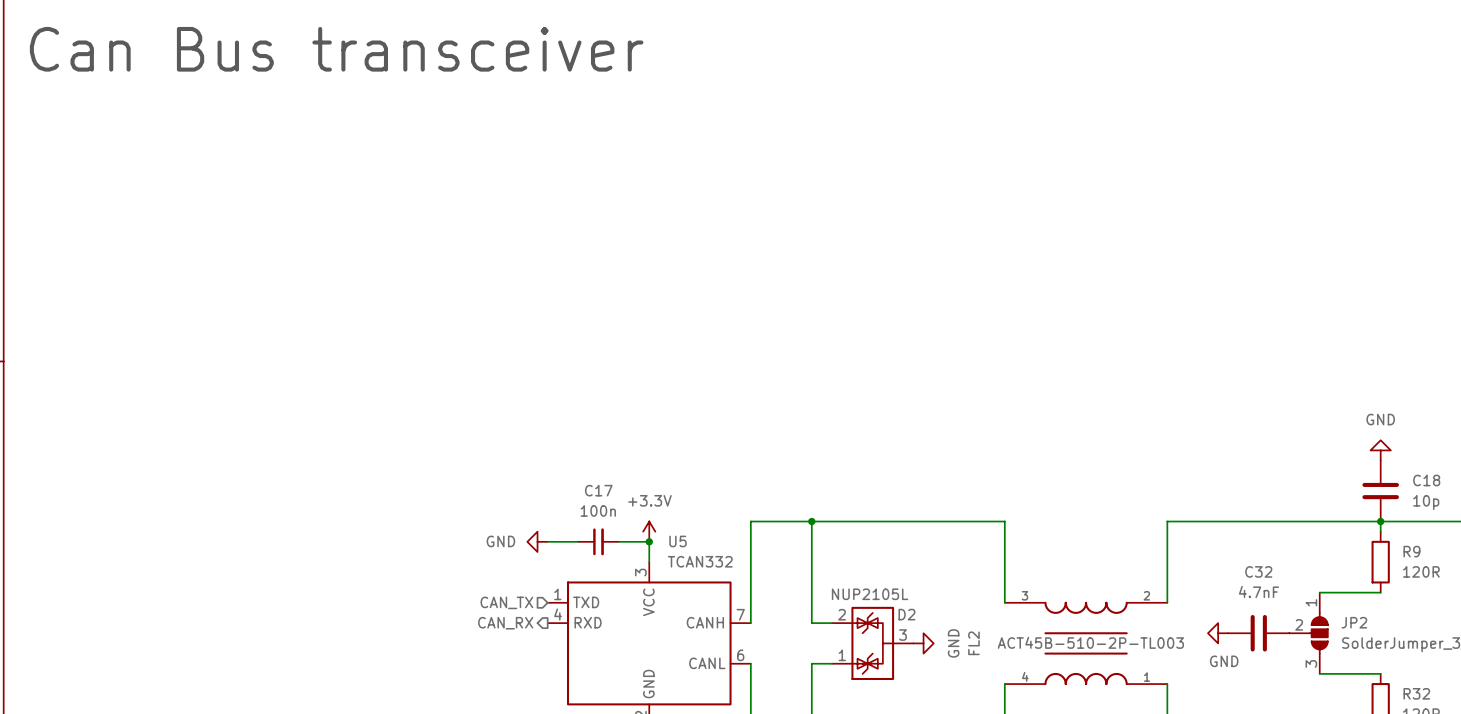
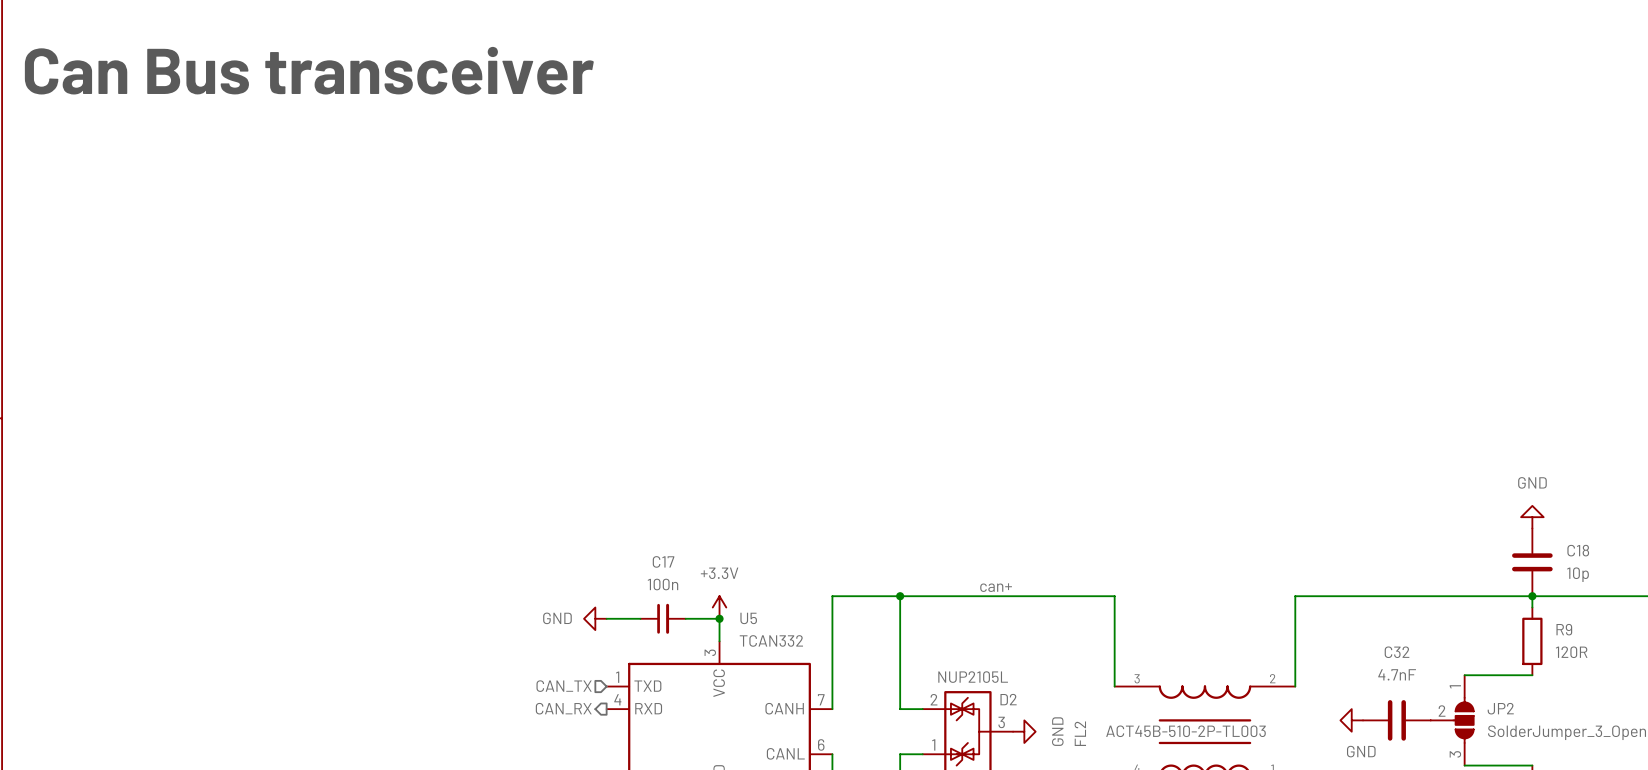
label: none -> can+ (996, 587)

